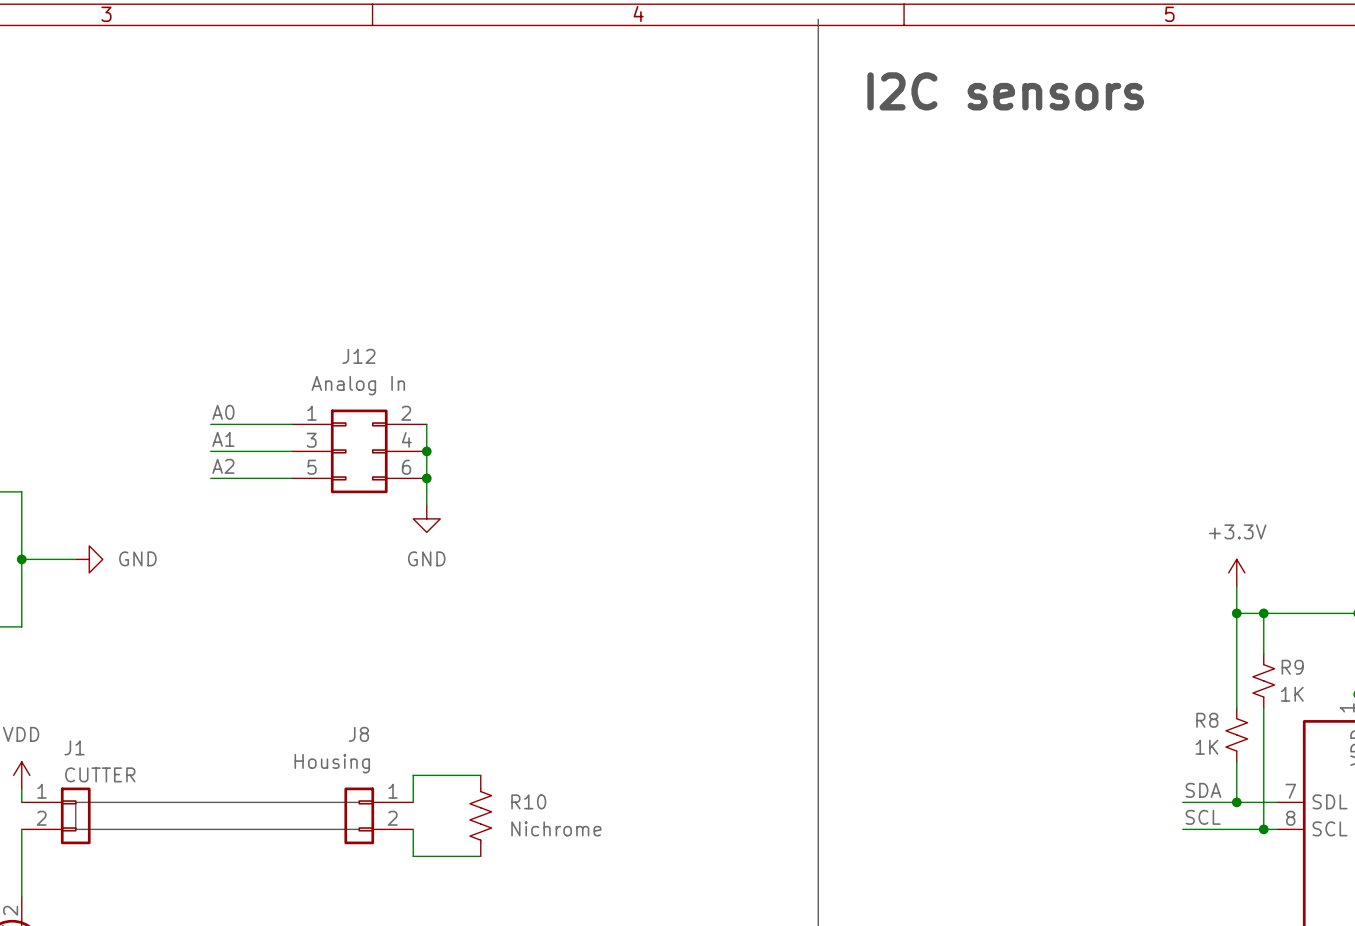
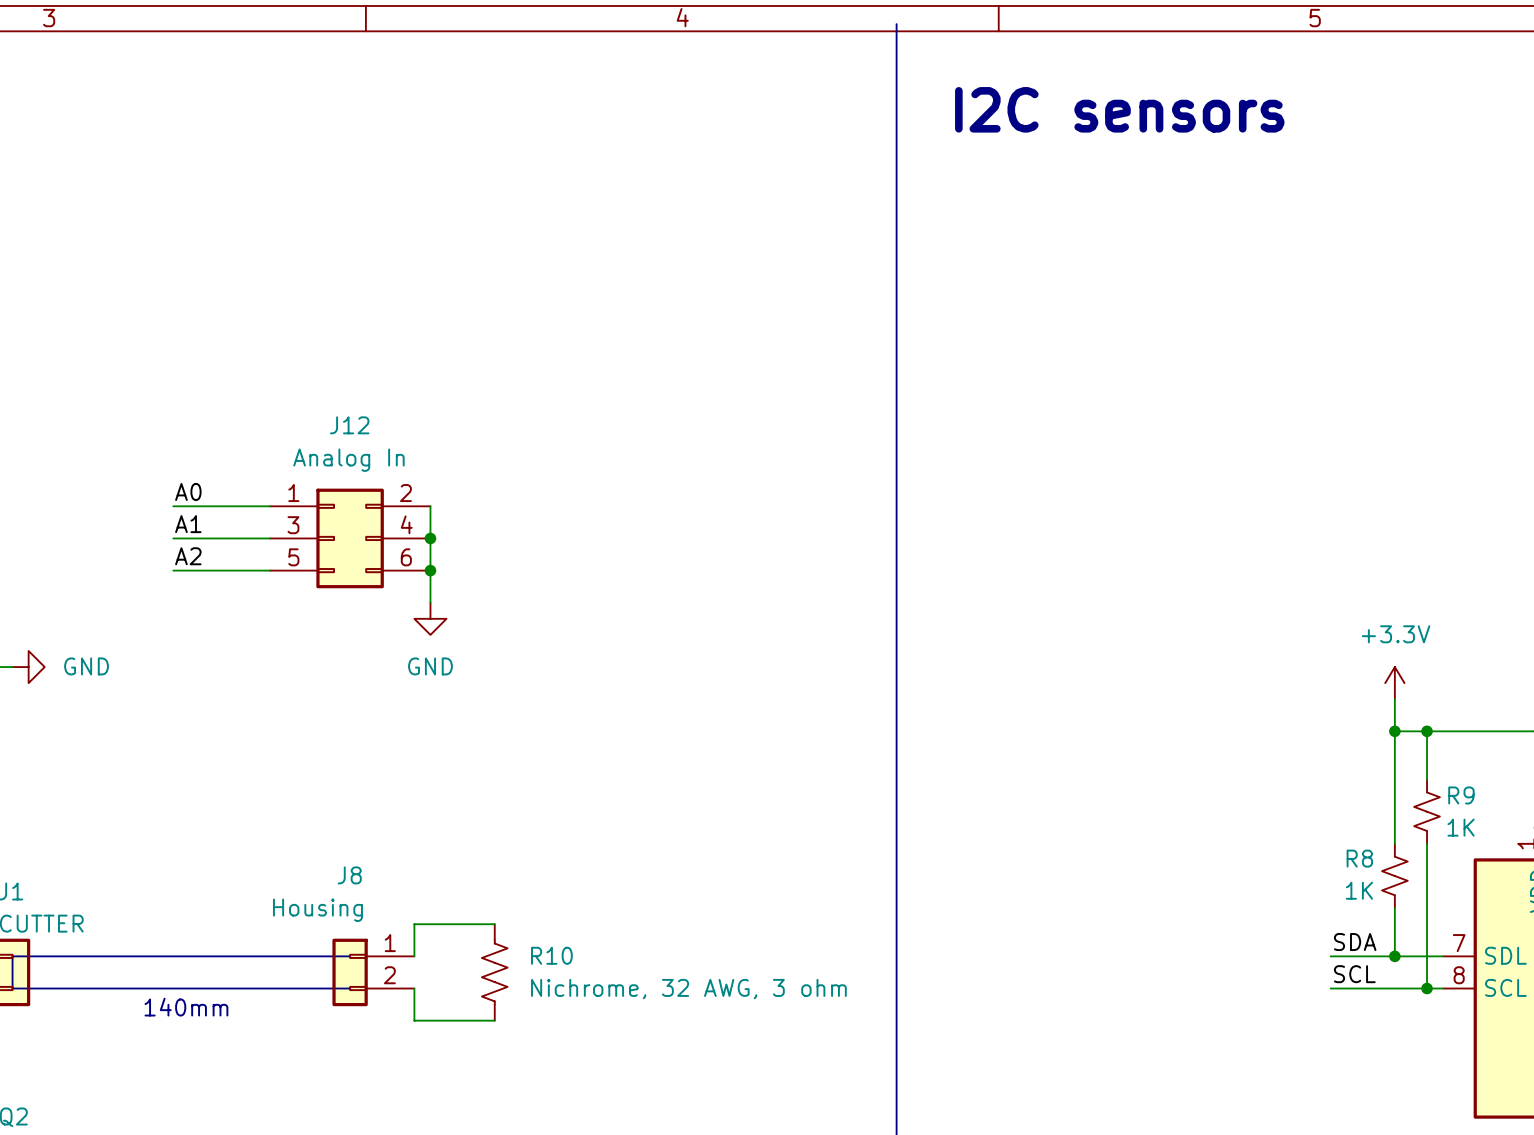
R10 value: Nichrome (556, 828) -> Nichrome, 32 AWG, 3 ohm (688, 989)
text: none -> 140mm (186, 1007)

